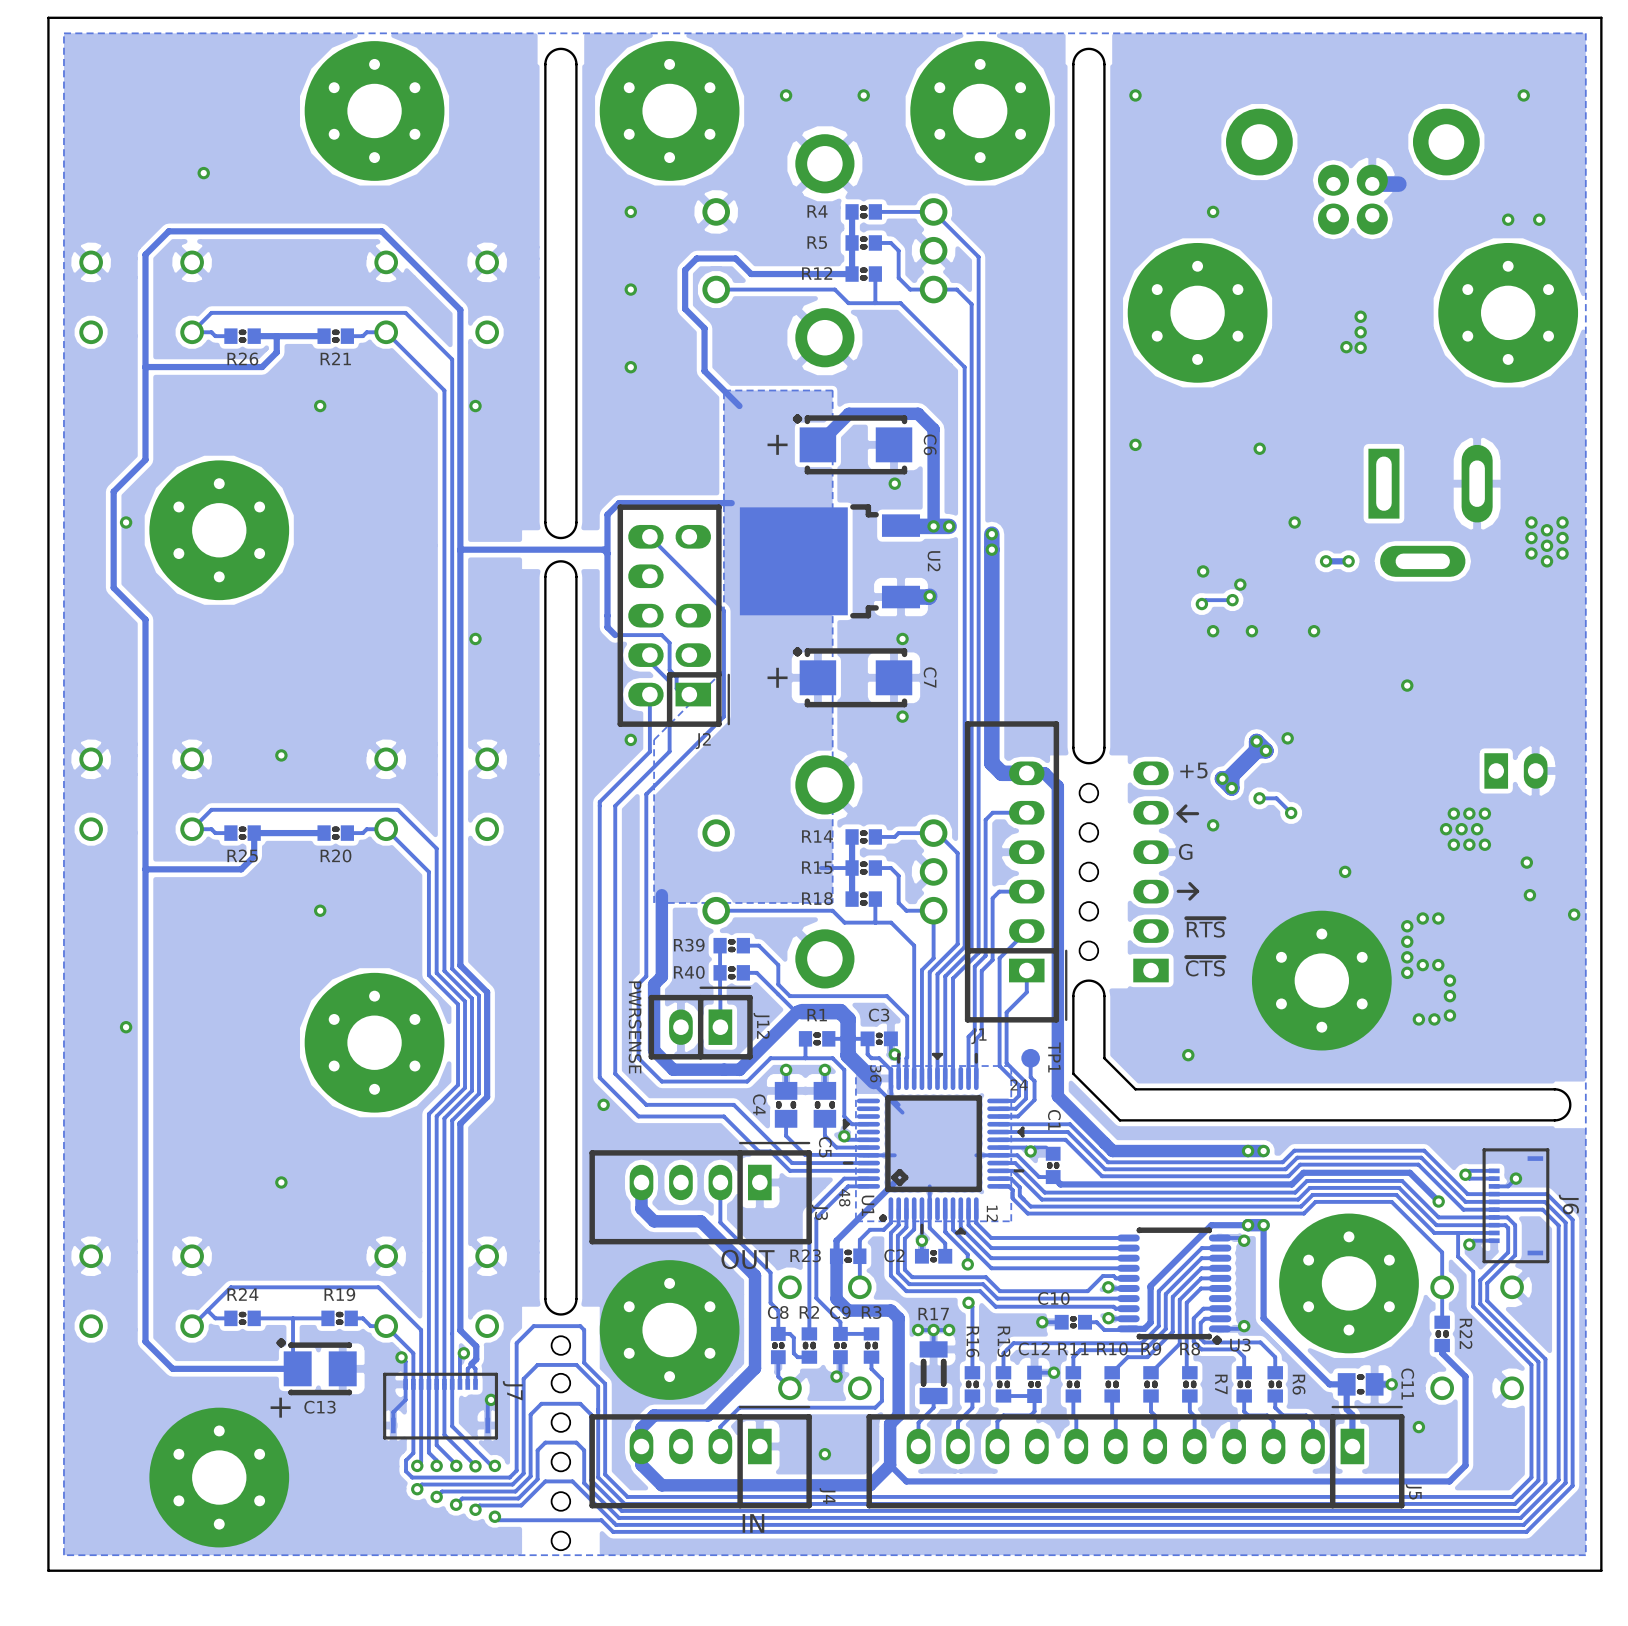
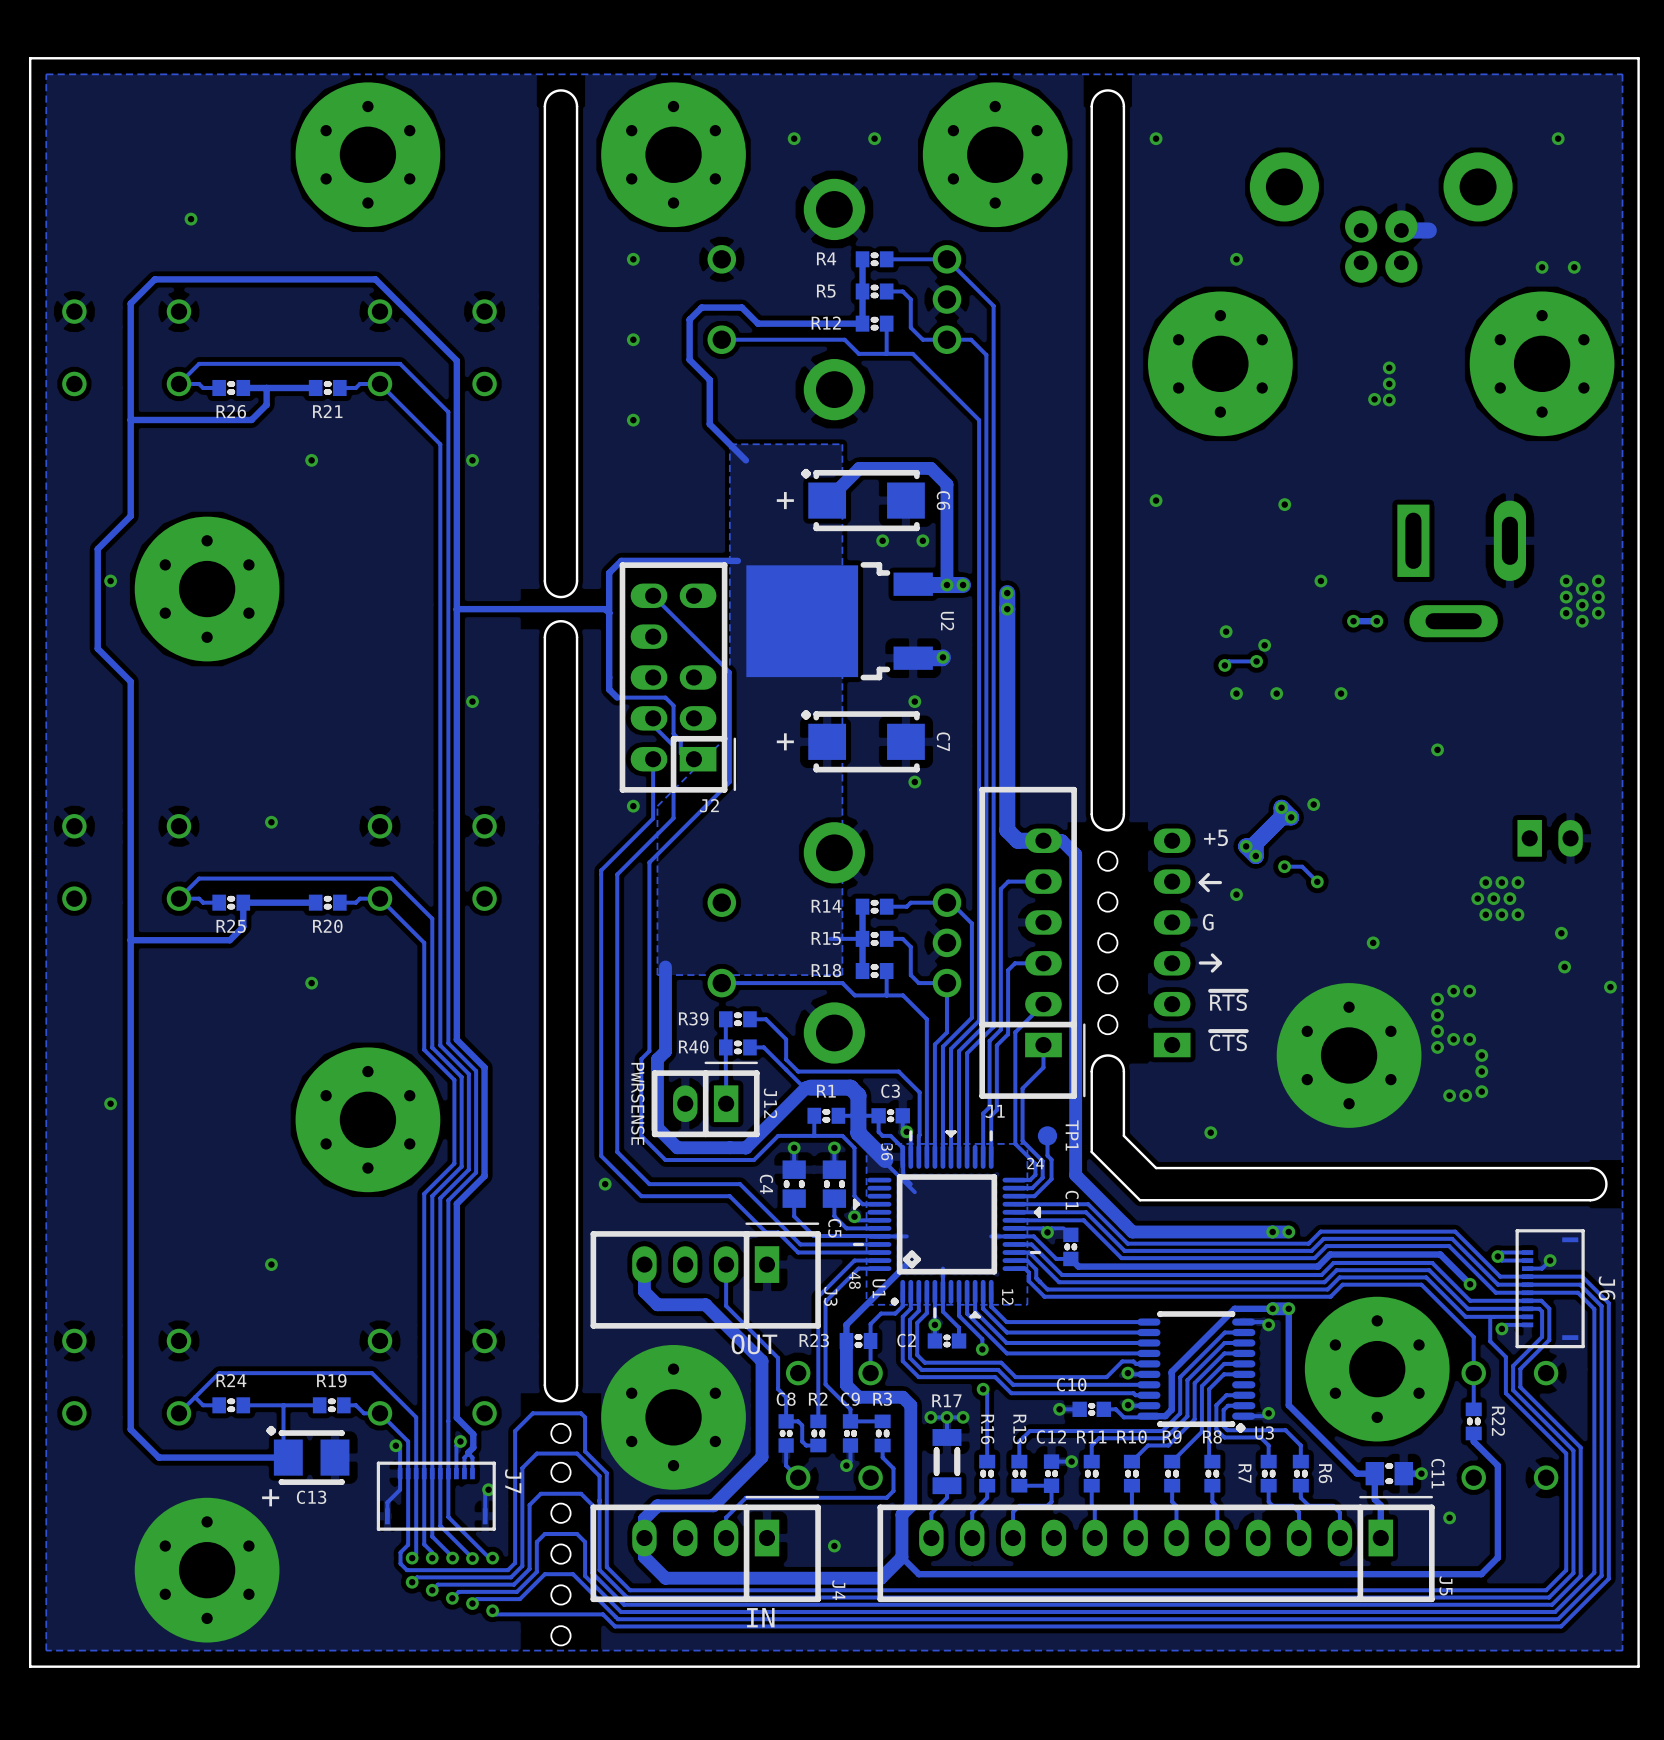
part: none -> (882, 540)
part: (894, 483) -> none
part: none -> (922, 540)

